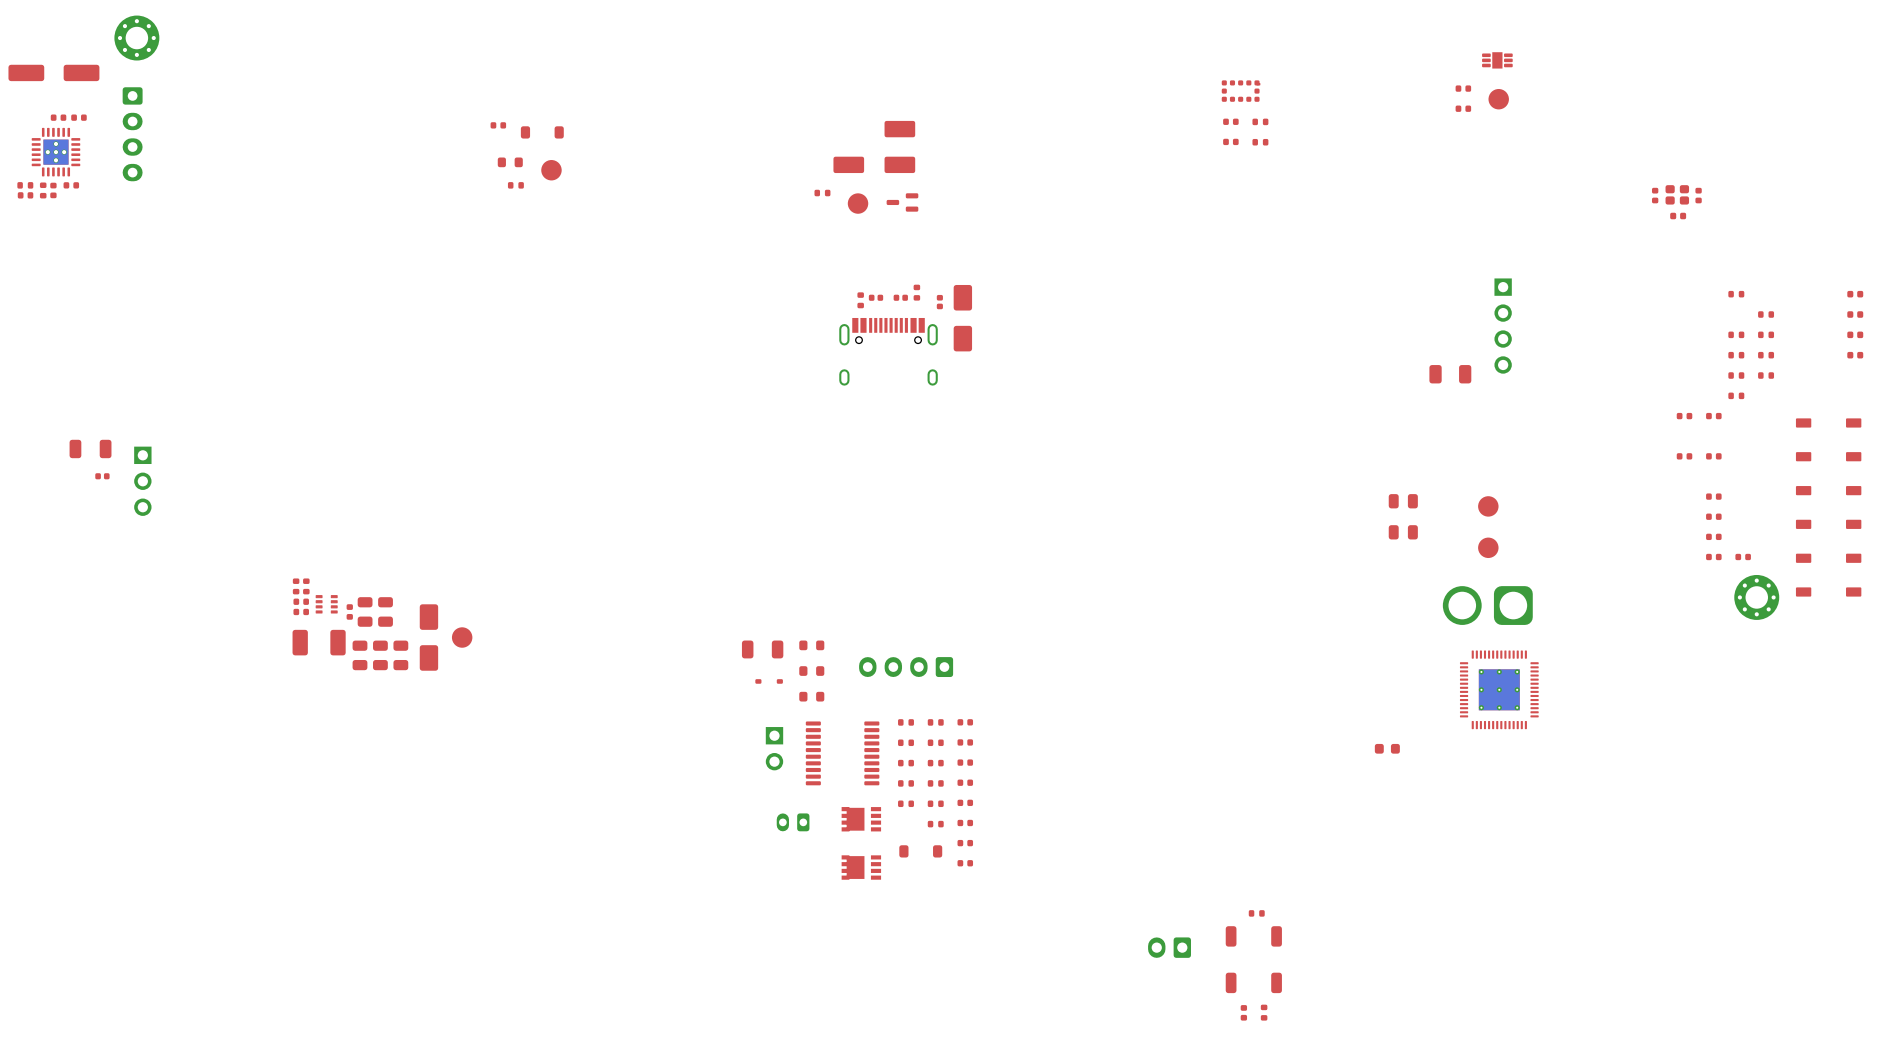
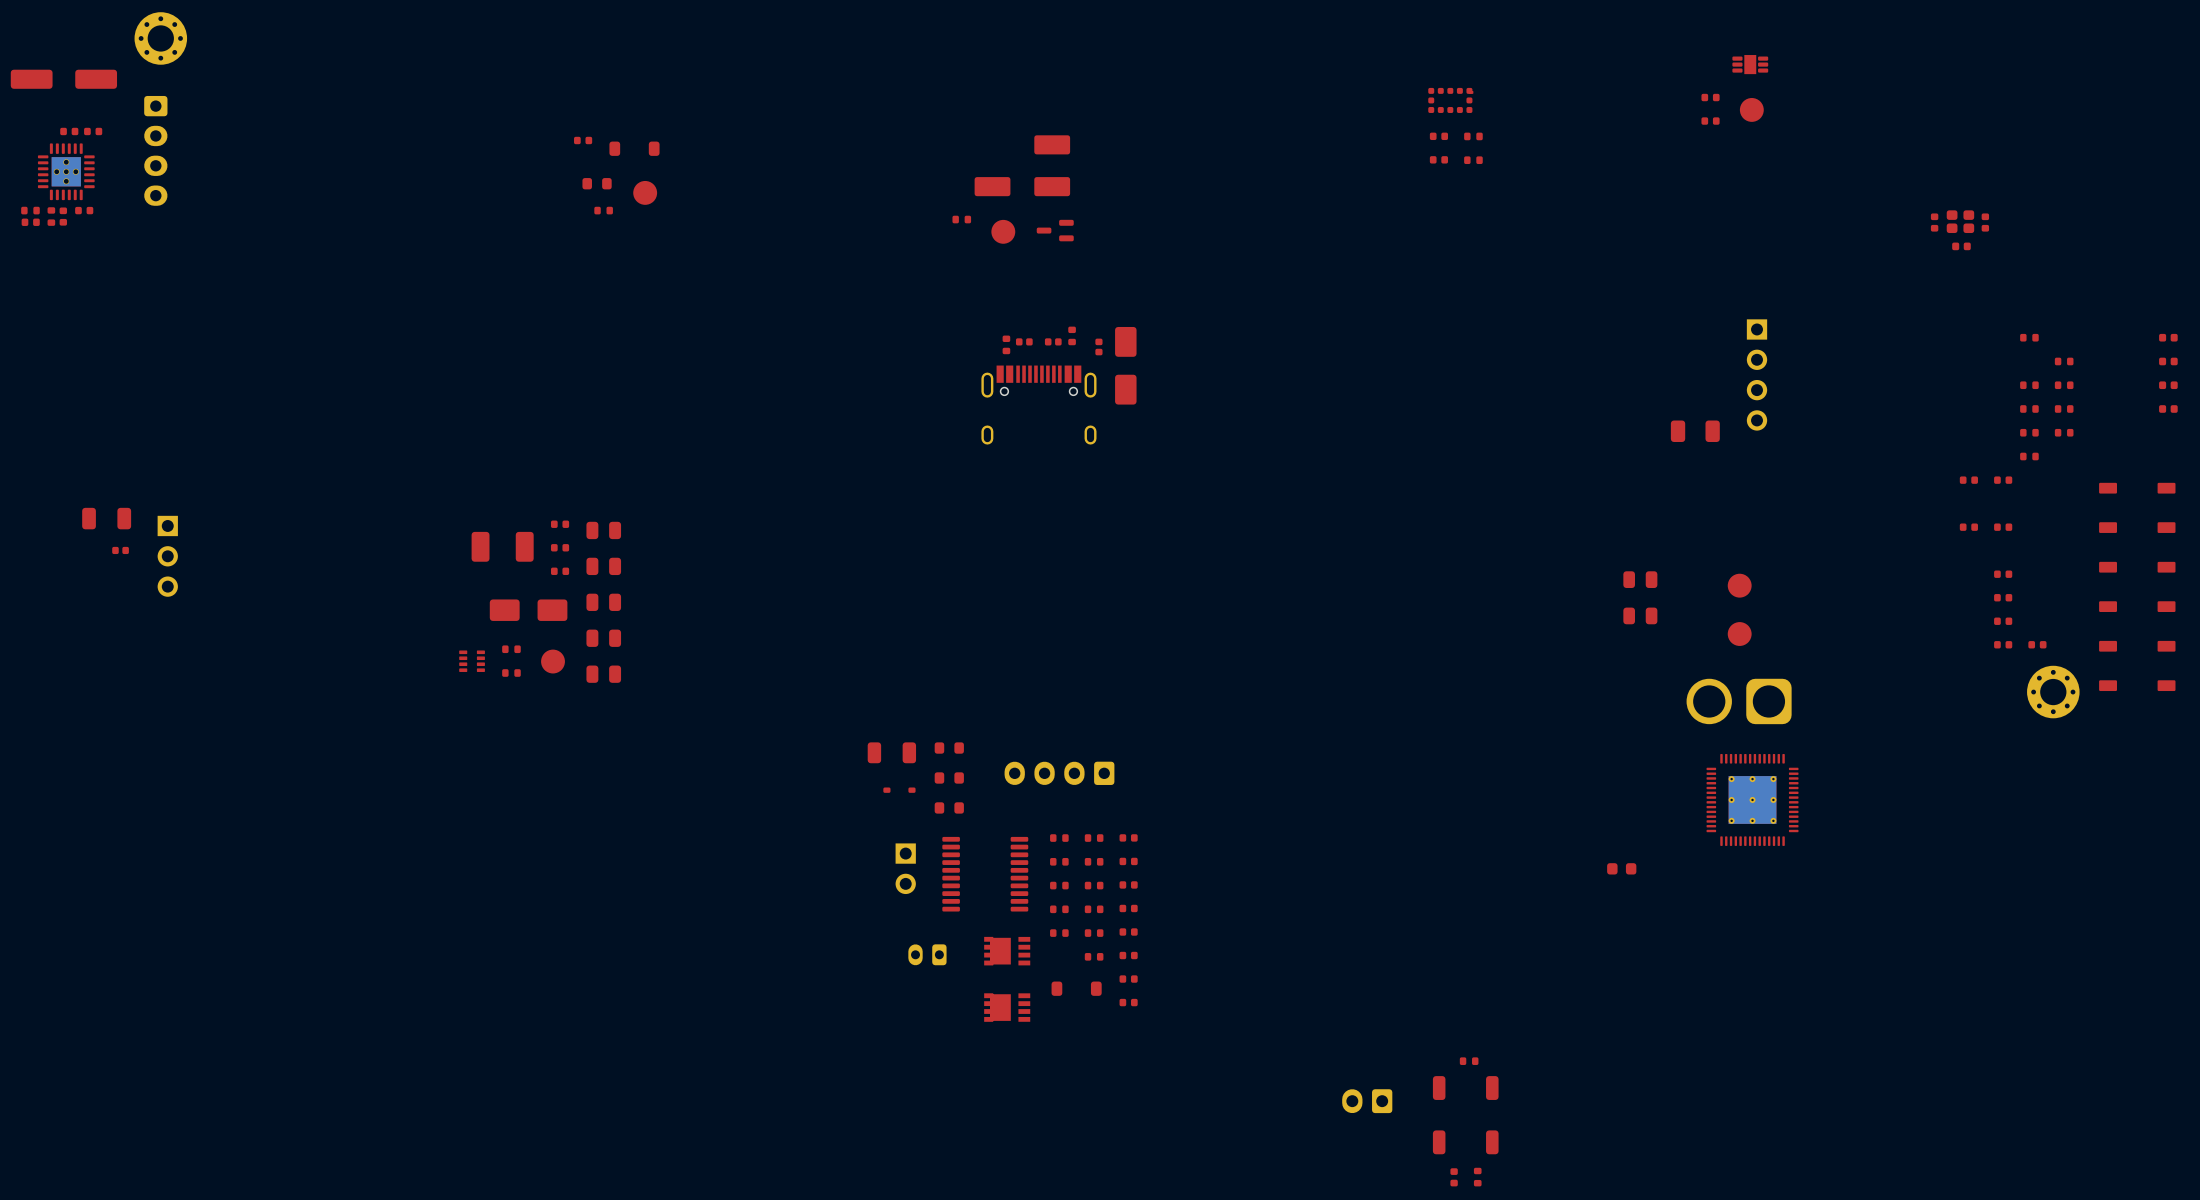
part: none -> (560, 524)
part: none -> (603, 530)
part: none -> (560, 547)
part: none -> (603, 566)
part: none -> (560, 571)
part: none -> (603, 602)
part: none -> (603, 638)
part: none -> (511, 649)
part: none -> (511, 673)
part: none -> (603, 674)
part: (296, 586) -> none
part: (306, 586) -> none
part: (301, 601) -> none
part position: (326, 604) -> (472, 661)
part: (301, 611) -> none
part: (349, 611) -> none
part: (365, 611) -> none
part: (385, 611) -> none
part rotation: 0° (428, 637) -> 90° clockwise (528, 610)
part position: (428, 637) -> (528, 610)
part position: (462, 637) -> (553, 661)
part position: (319, 642) -> (502, 546)
part: (359, 655) -> none
part: (380, 655) -> none
part: (400, 655) -> none

